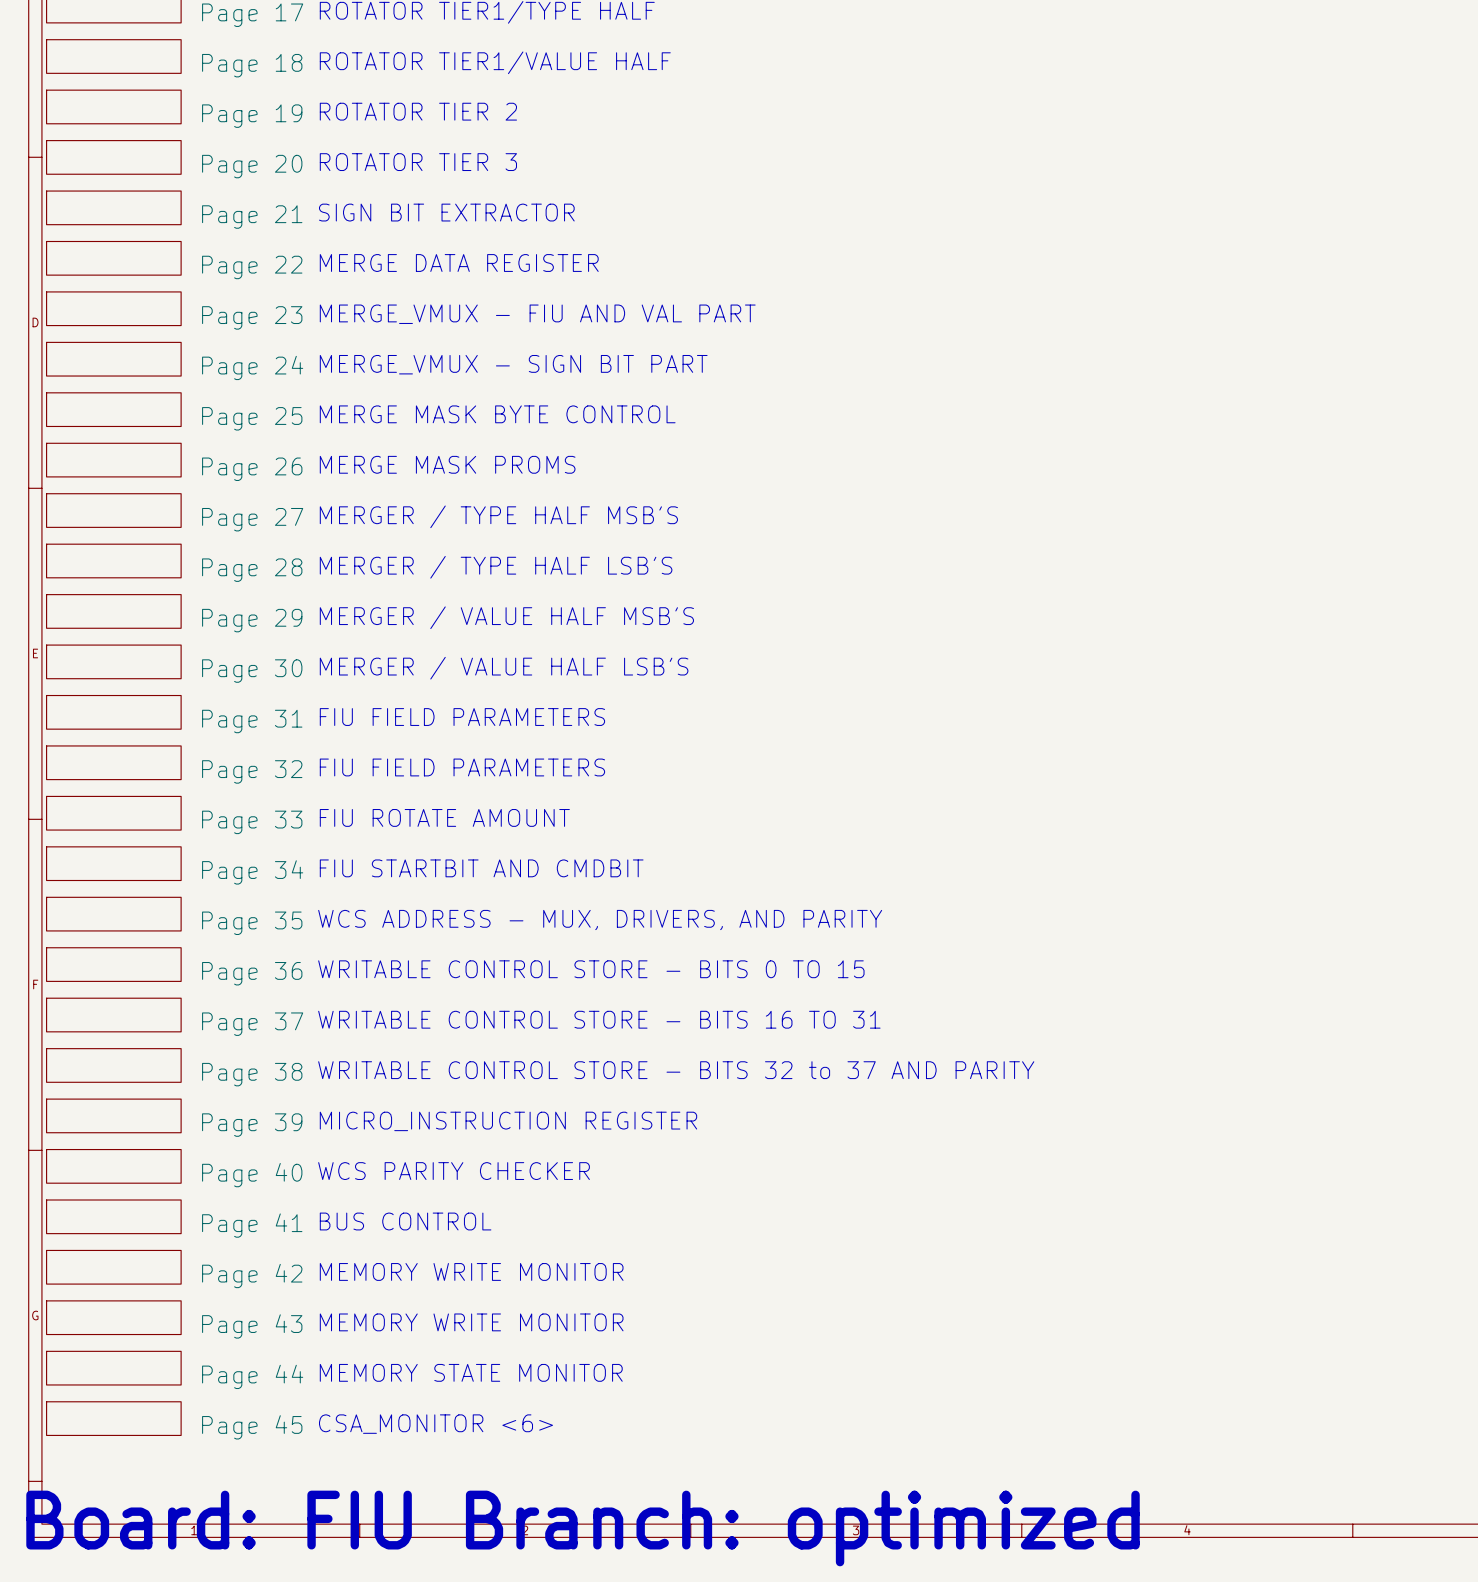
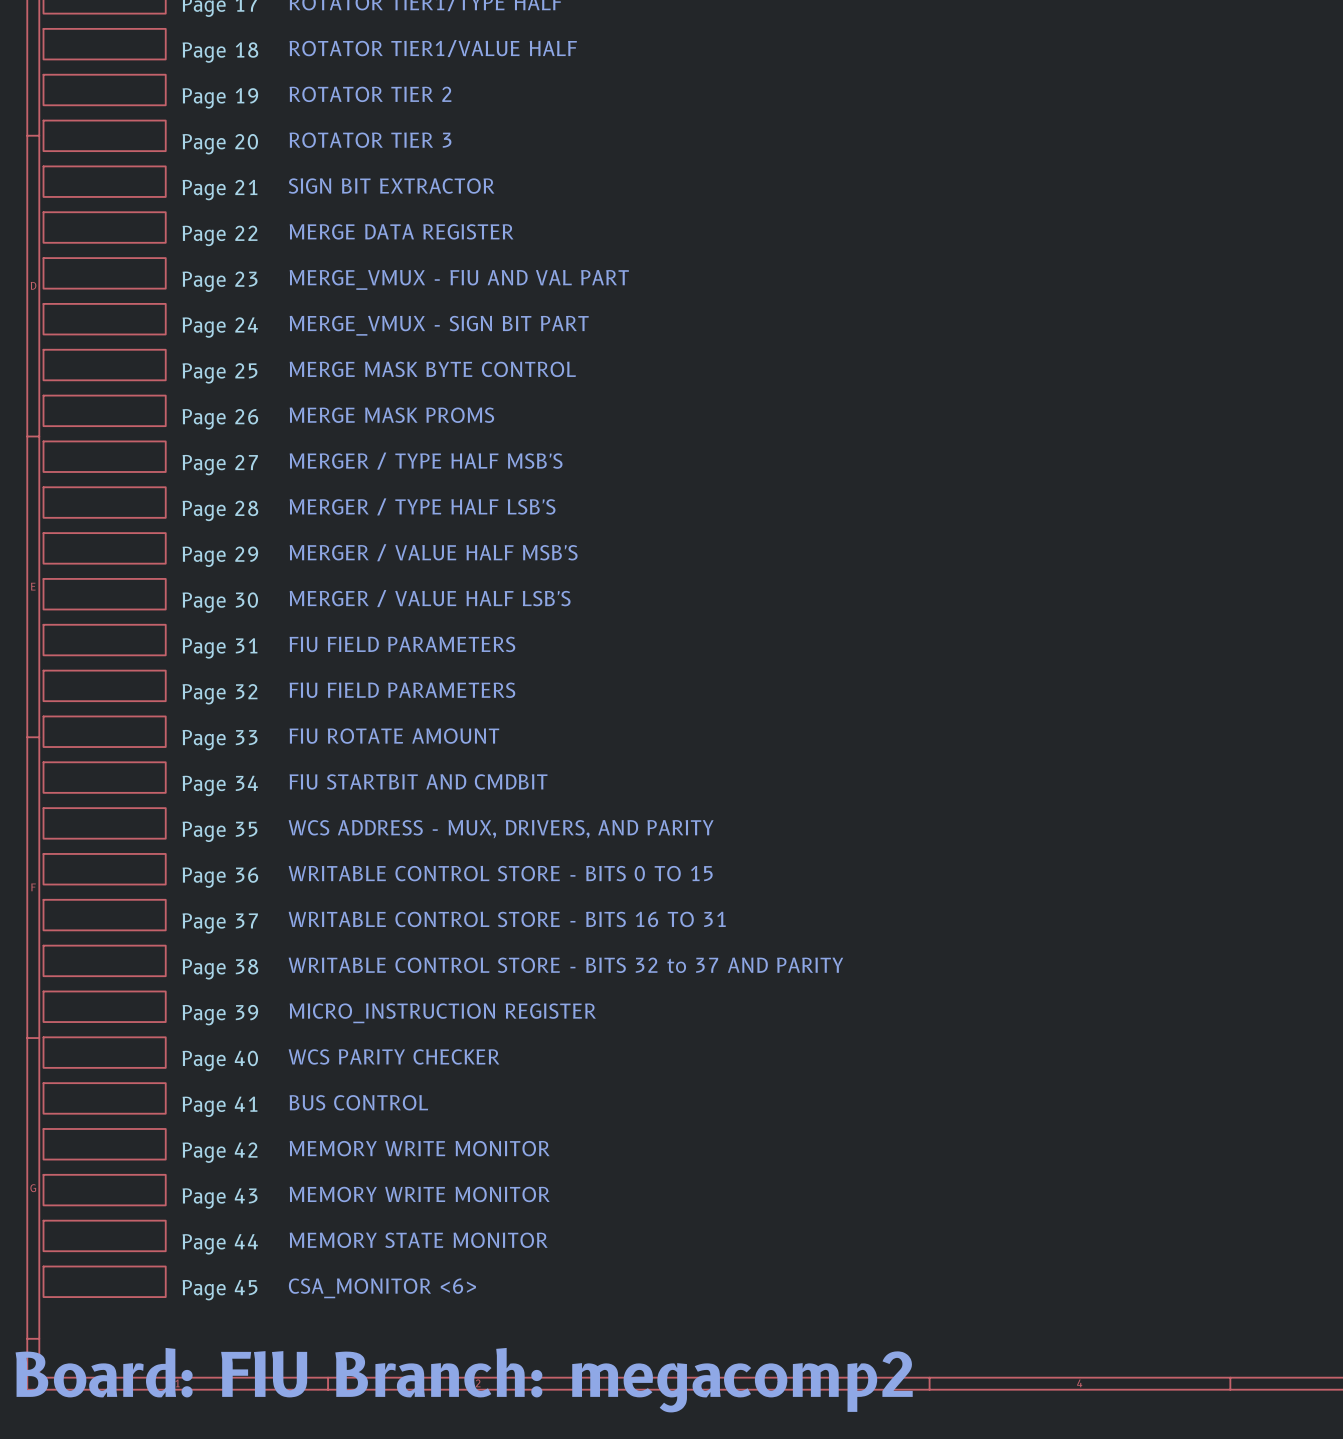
text: Board: FIU Branch: optimized (583, 1528) -> Board: FIU Branch: megacomp2 (464, 1380)

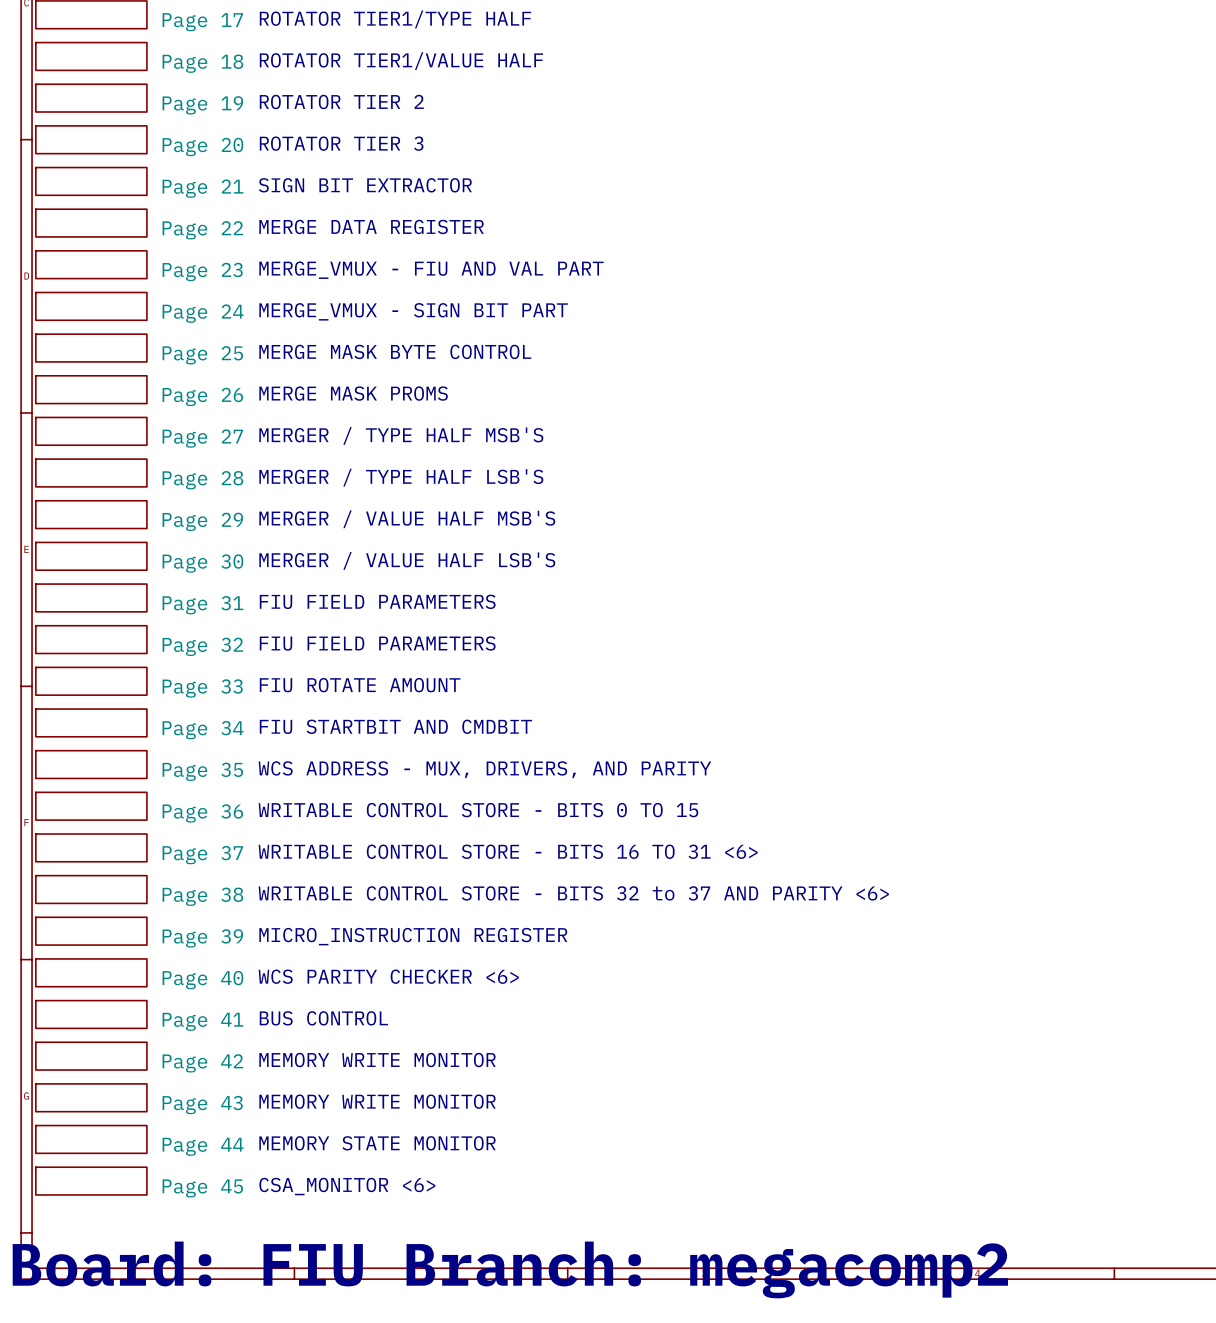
text: WRITABLE CONTROL STORE - BITS 16 TO 31 (507, 919) -> WRITABLE CONTROL STORE - BITS 16 TO 31 <6> (508, 851)
text: WRITABLE CONTROL STORE - BITS 32 to 37 AND PARITY (565, 965) -> WRITABLE CONTROL STORE - BITS 32 to 37 AND PARITY <6> (573, 893)
text: WCS PARITY CHECKER (394, 1056) -> WCS PARITY CHECKER <6> (388, 976)

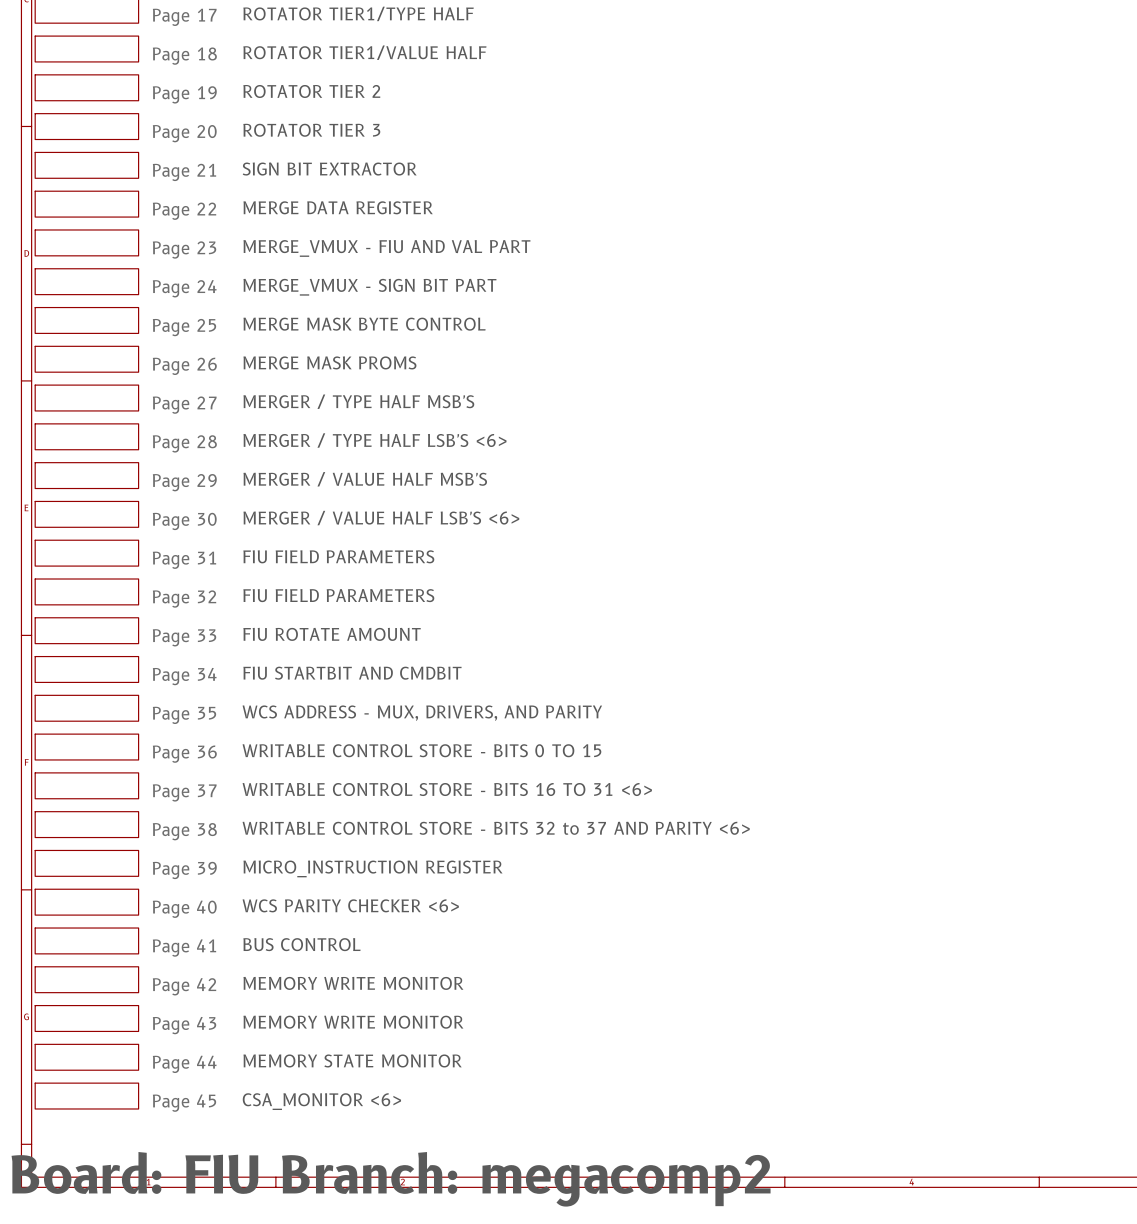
text: MERGER / TYPE HALF LSB'S (401, 477) -> MERGER / TYPE HALF LSB'S <6> (374, 440)
text: MERGER / VALUE HALF LSB'S (407, 560) -> MERGER / VALUE HALF LSB'S <6> (381, 518)

